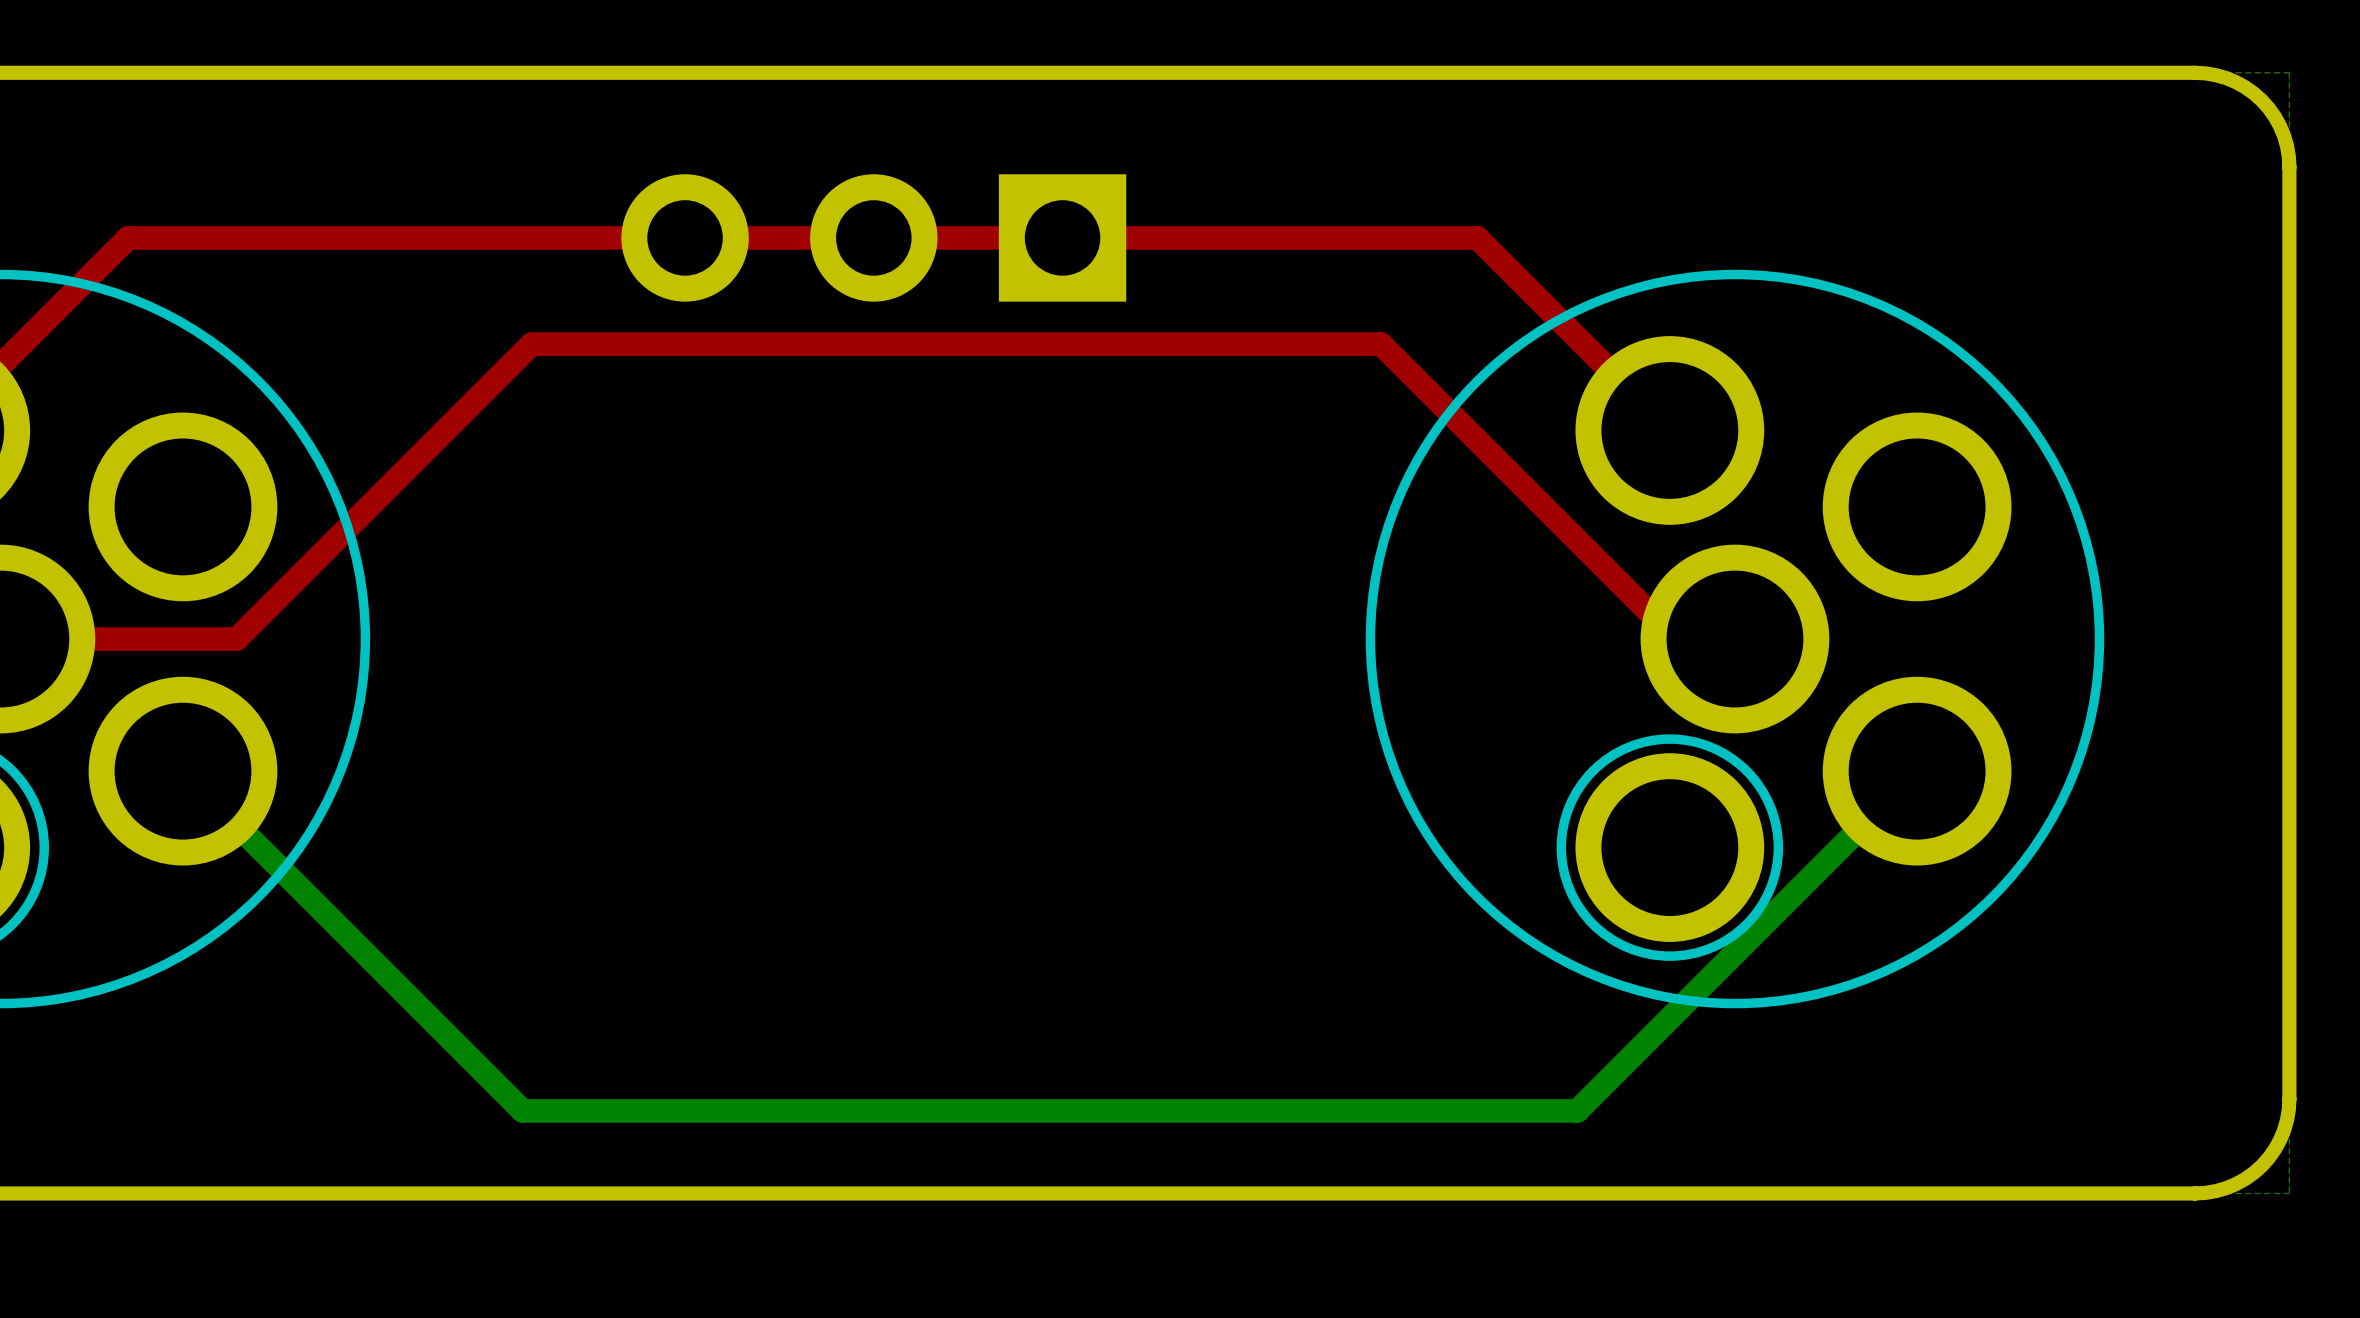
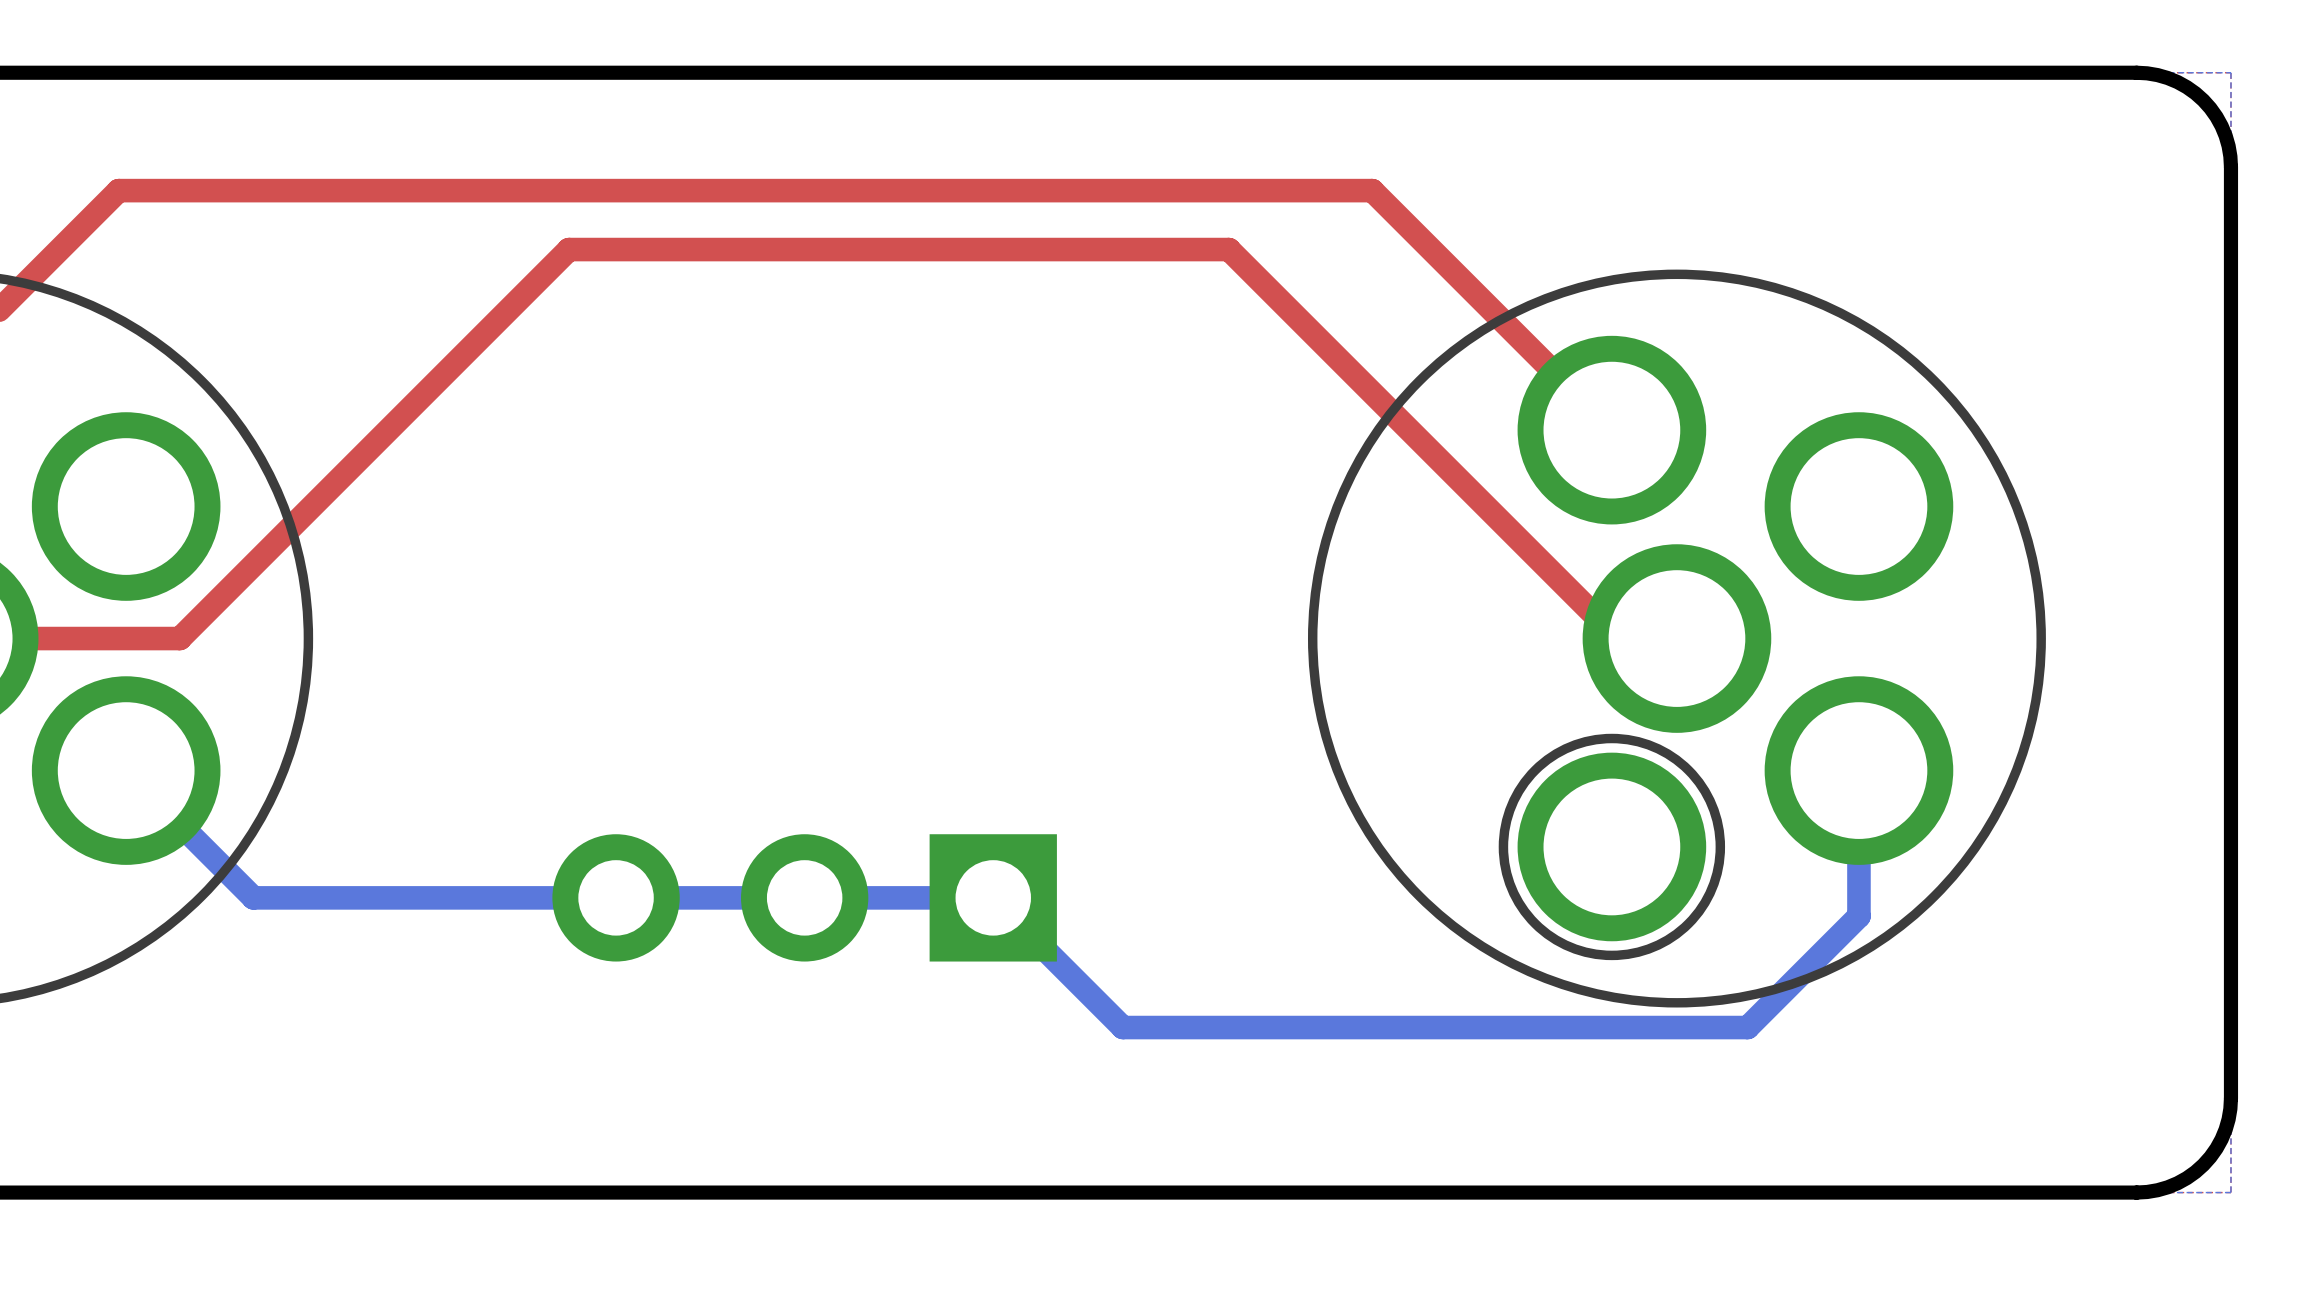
part position: (873, 237) -> (804, 897)
top track: (1477, 237) (128, 237) -> (1419, 237) (1372, 190) (118, 190) (71, 237)
top track: (1381, 344) (531, 344) -> (1323, 343) (1229, 249) (568, 249) (474, 343)
bottom track: (1917, 771) (1577, 1110) (522, 1110) (310, 898) -> (1858, 770) (1858, 916) (1747, 1027) (1122, 1027) (993, 897) (253, 897)

